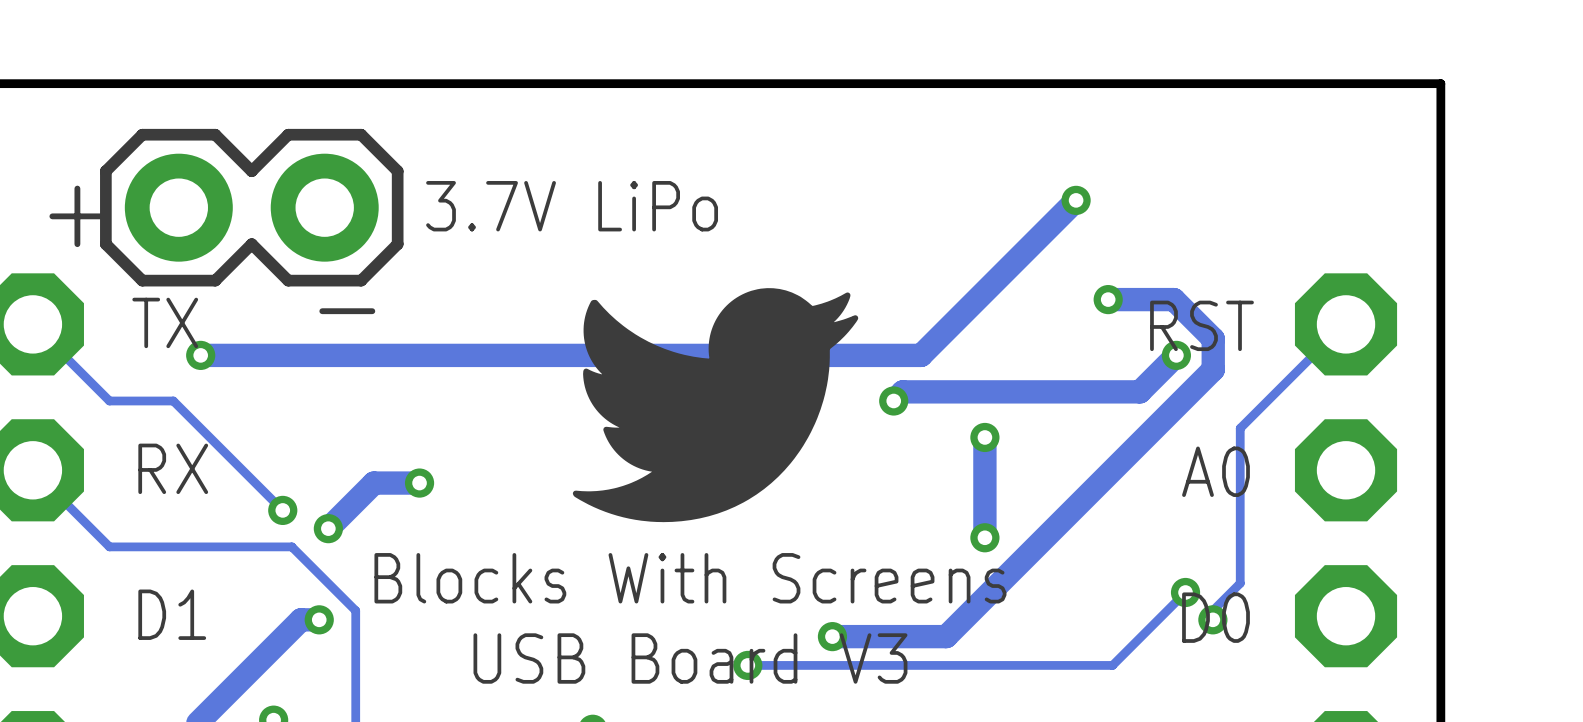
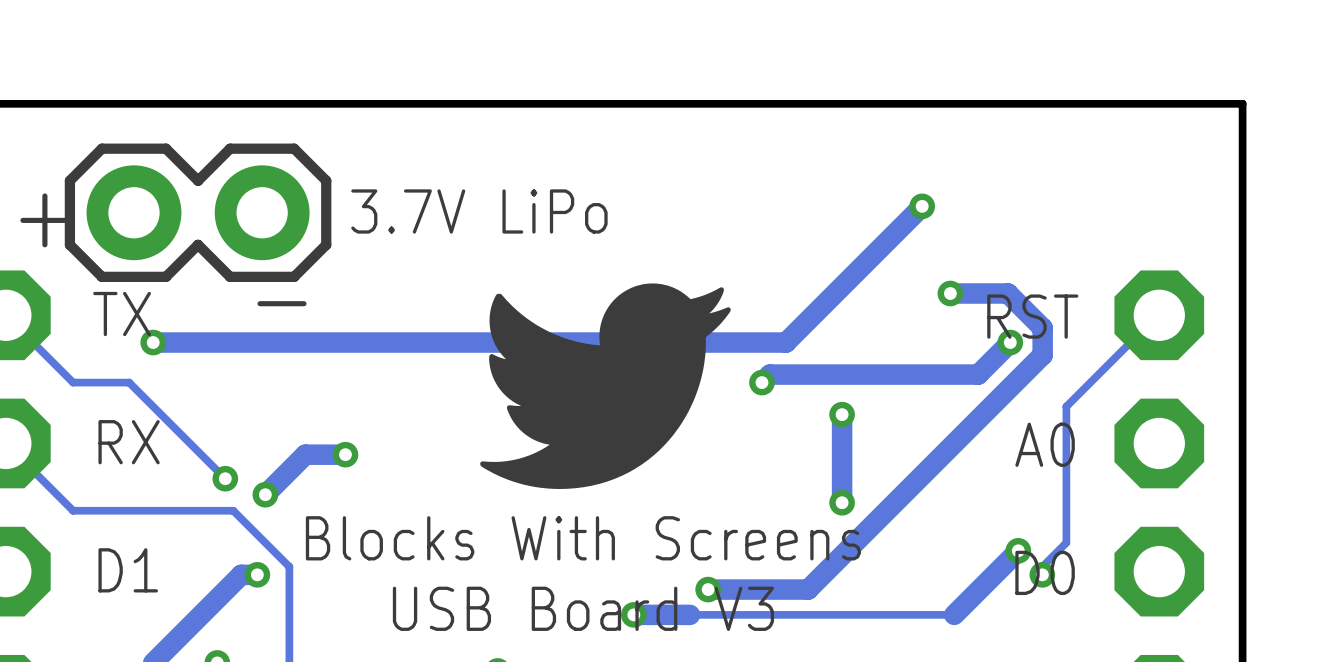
track width: thin (1185, 592) (1112, 665) -> thick (1018, 550) (954, 614)
track width: thin (811, 665) (747, 665) -> thick (689, 614) (633, 614)

